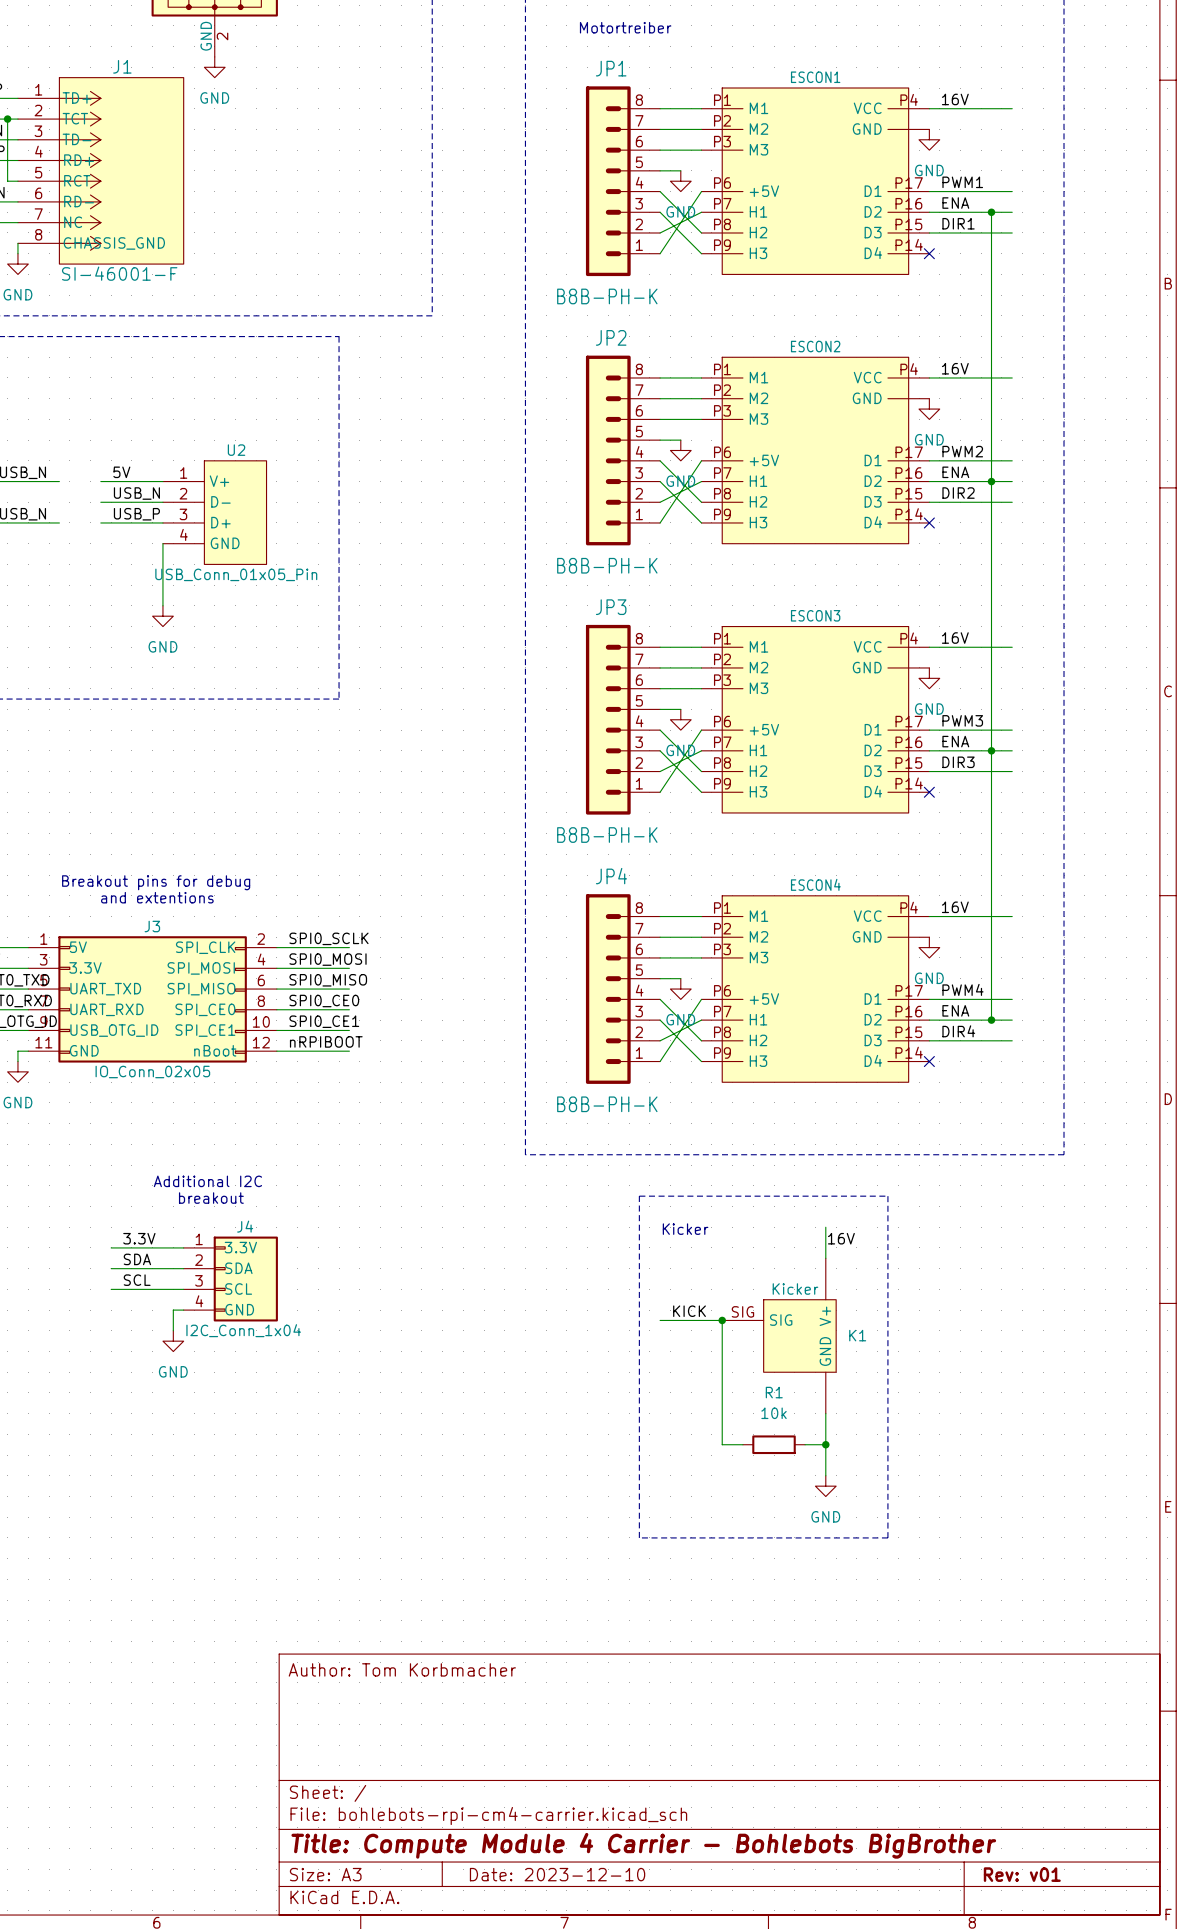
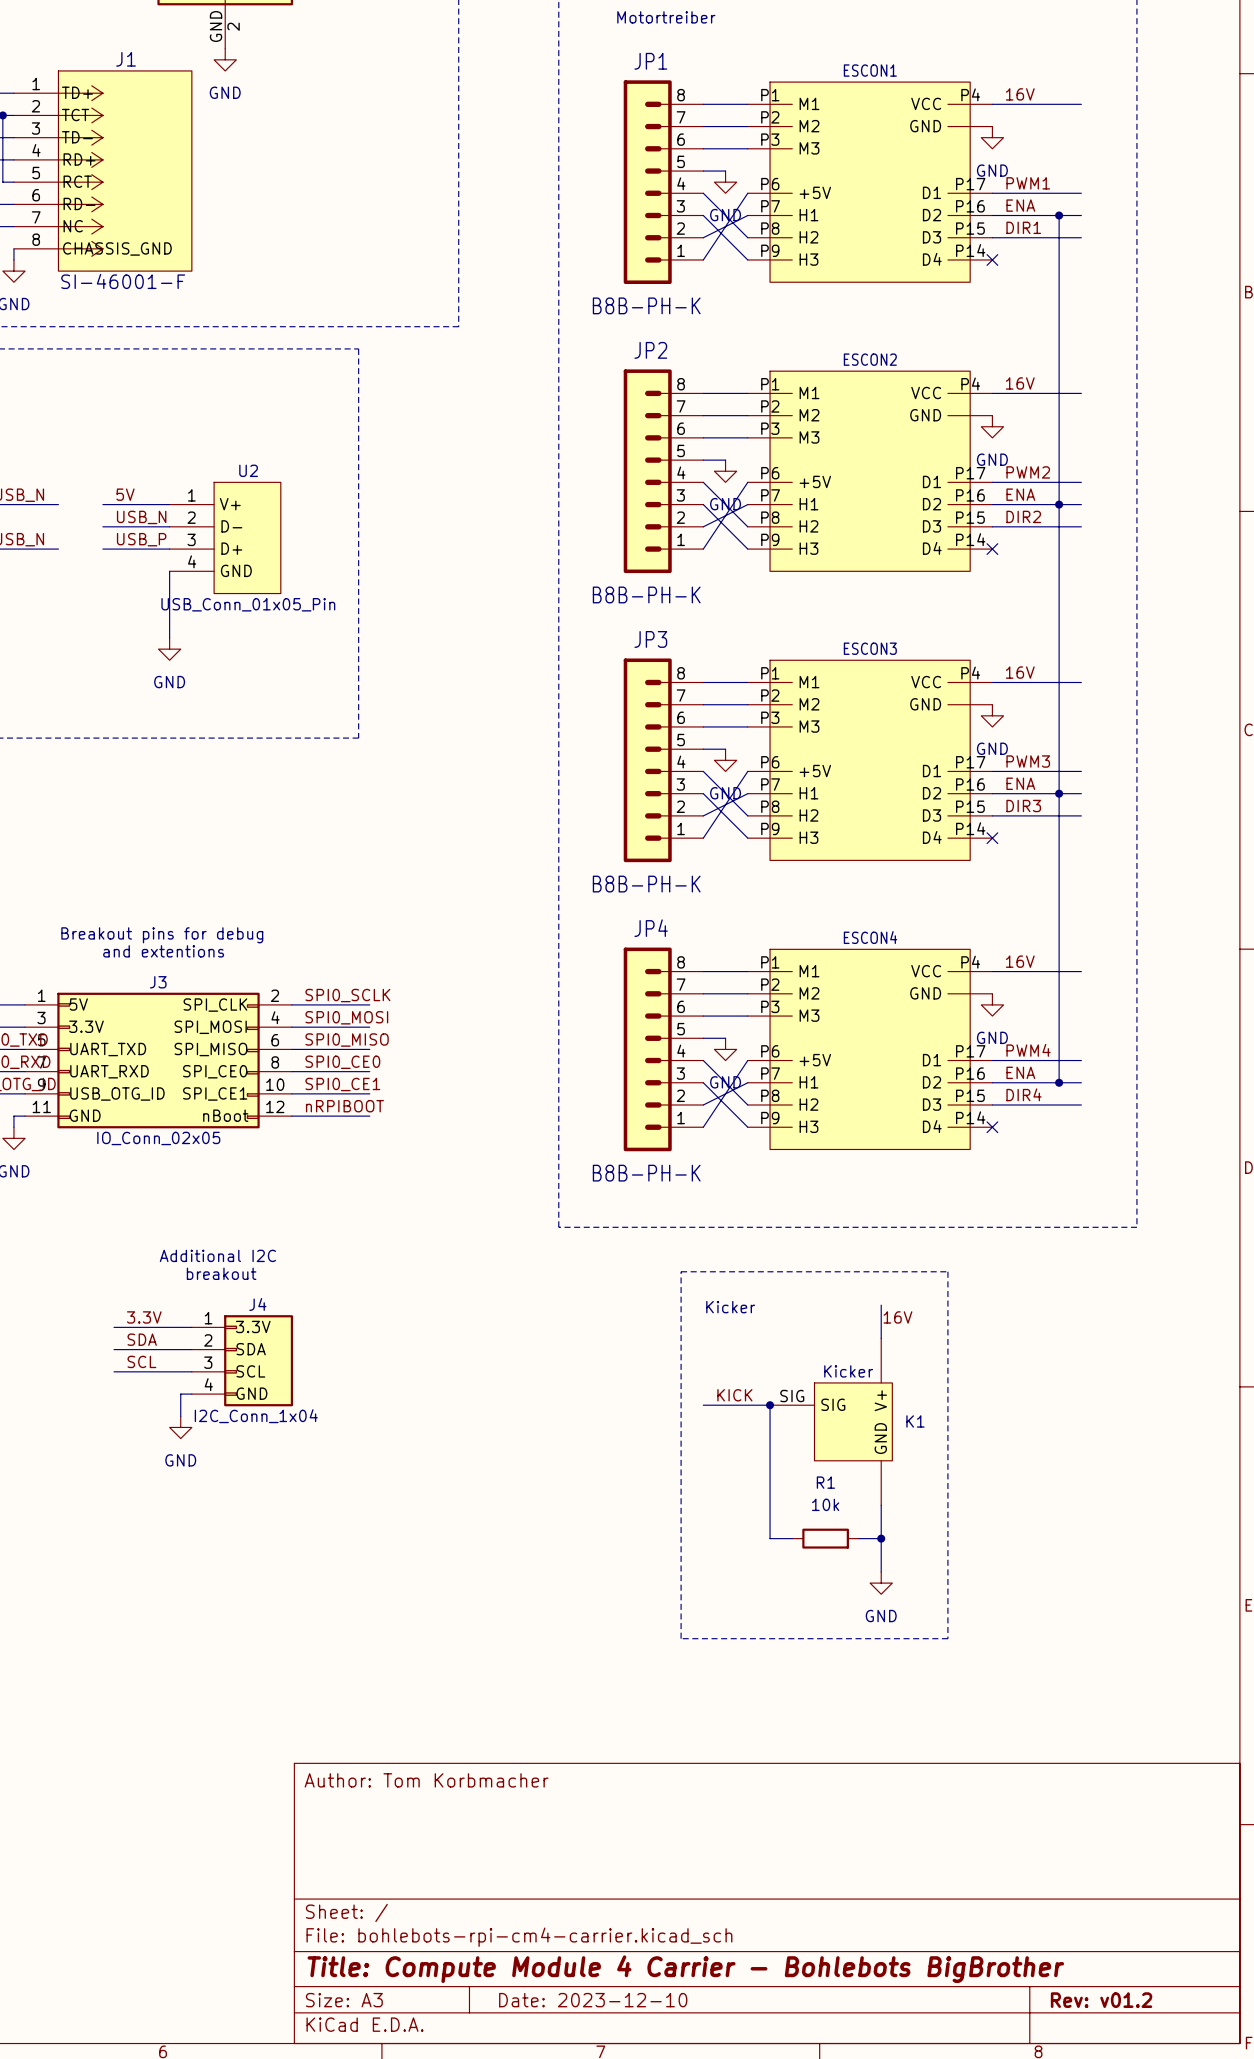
title block: Rev: v01 (1022, 1874) -> Rev: v01.2 (1101, 2000)

